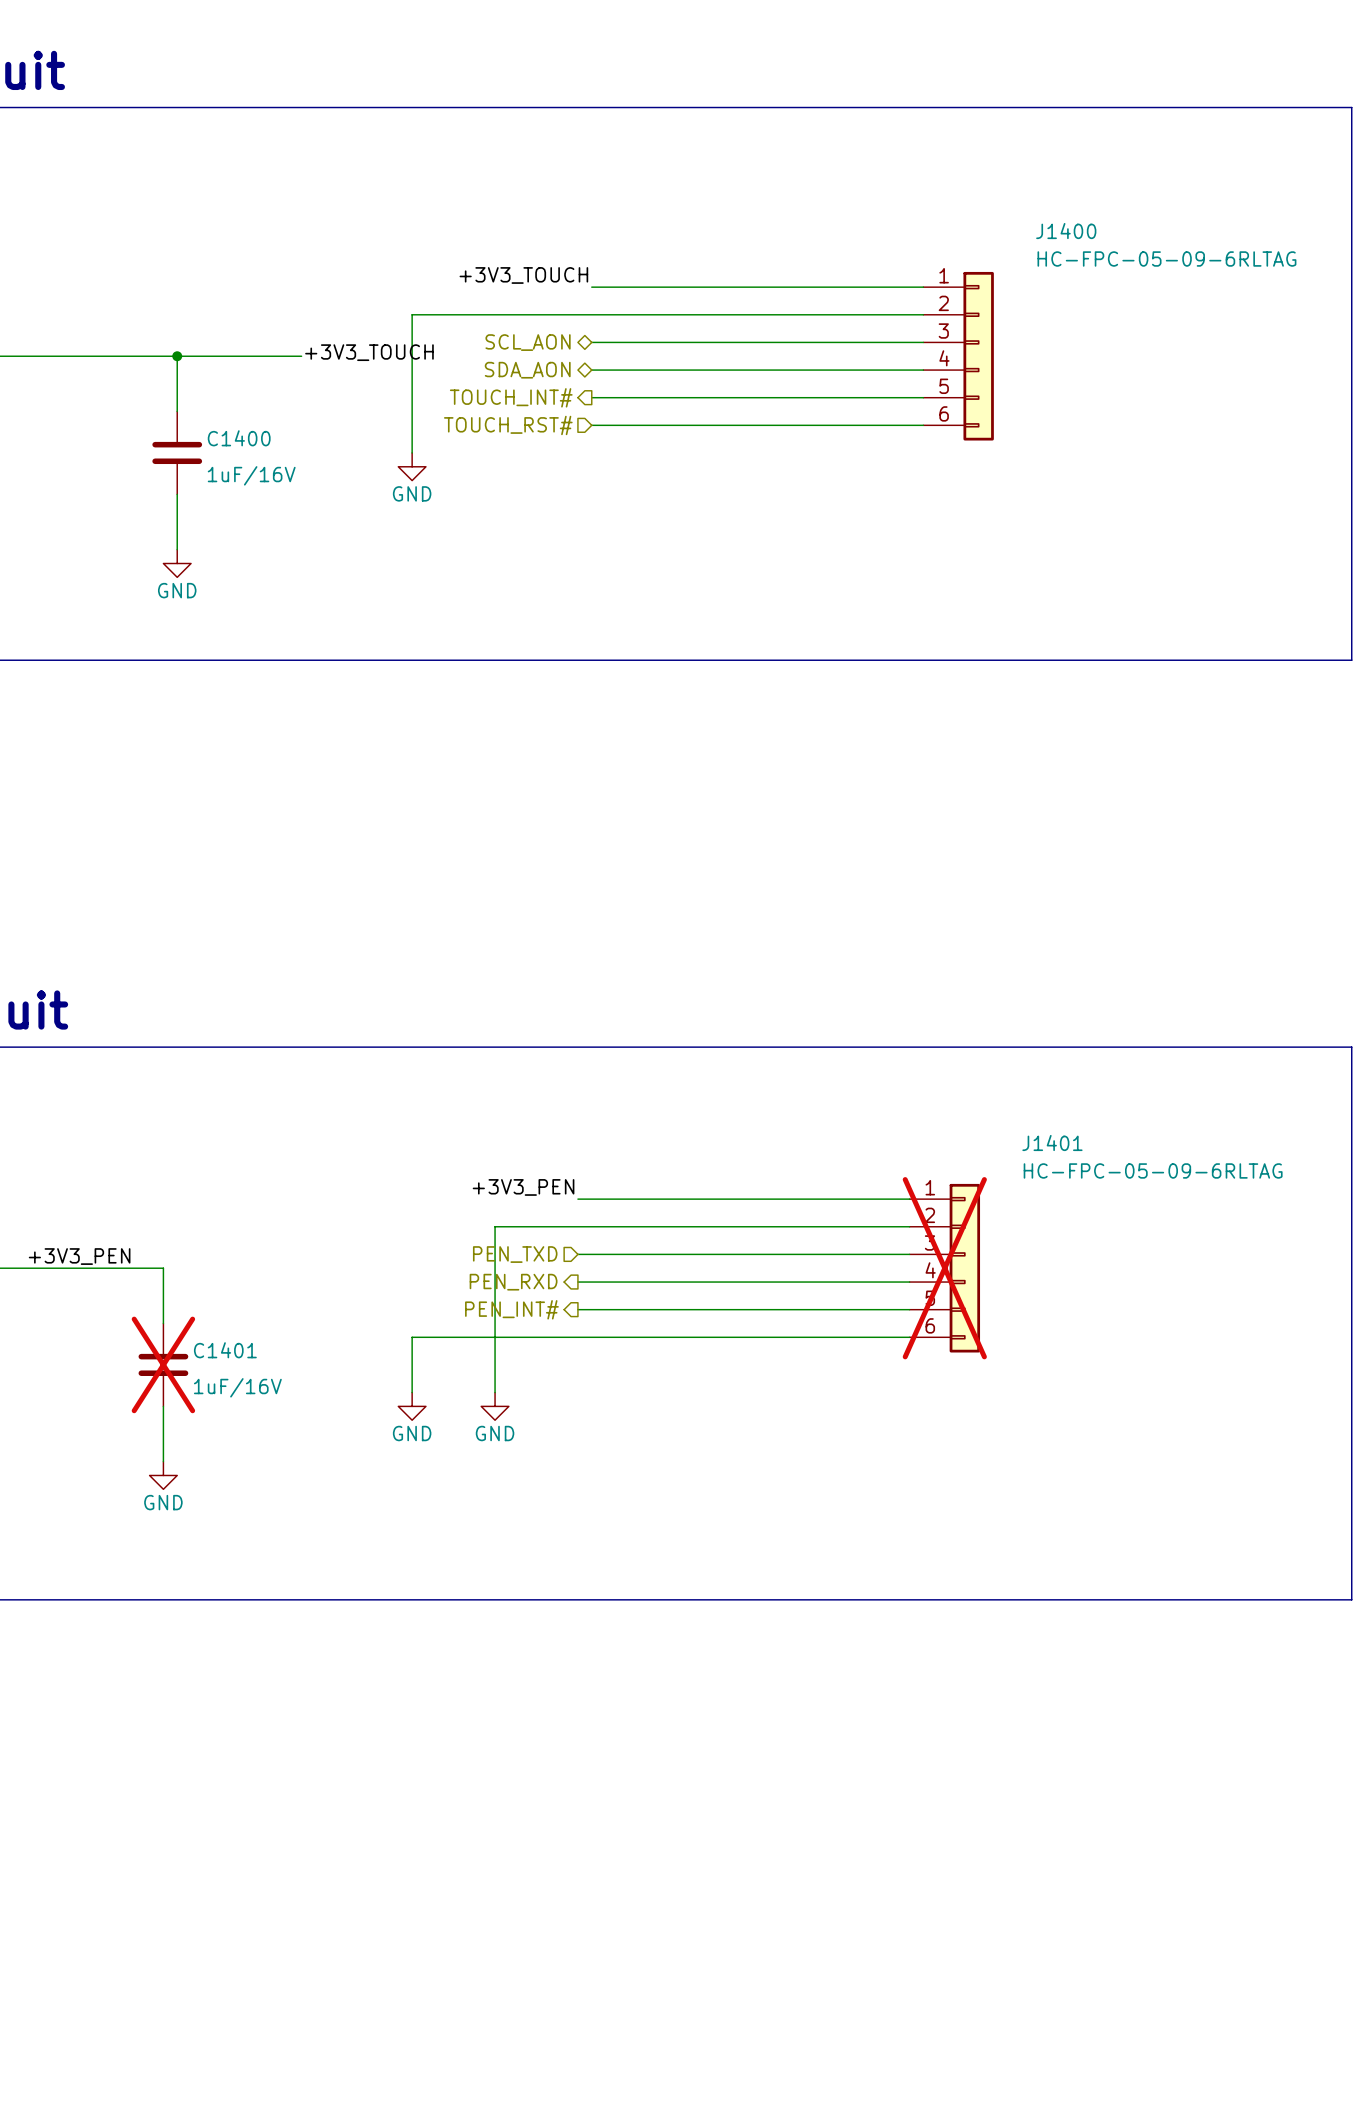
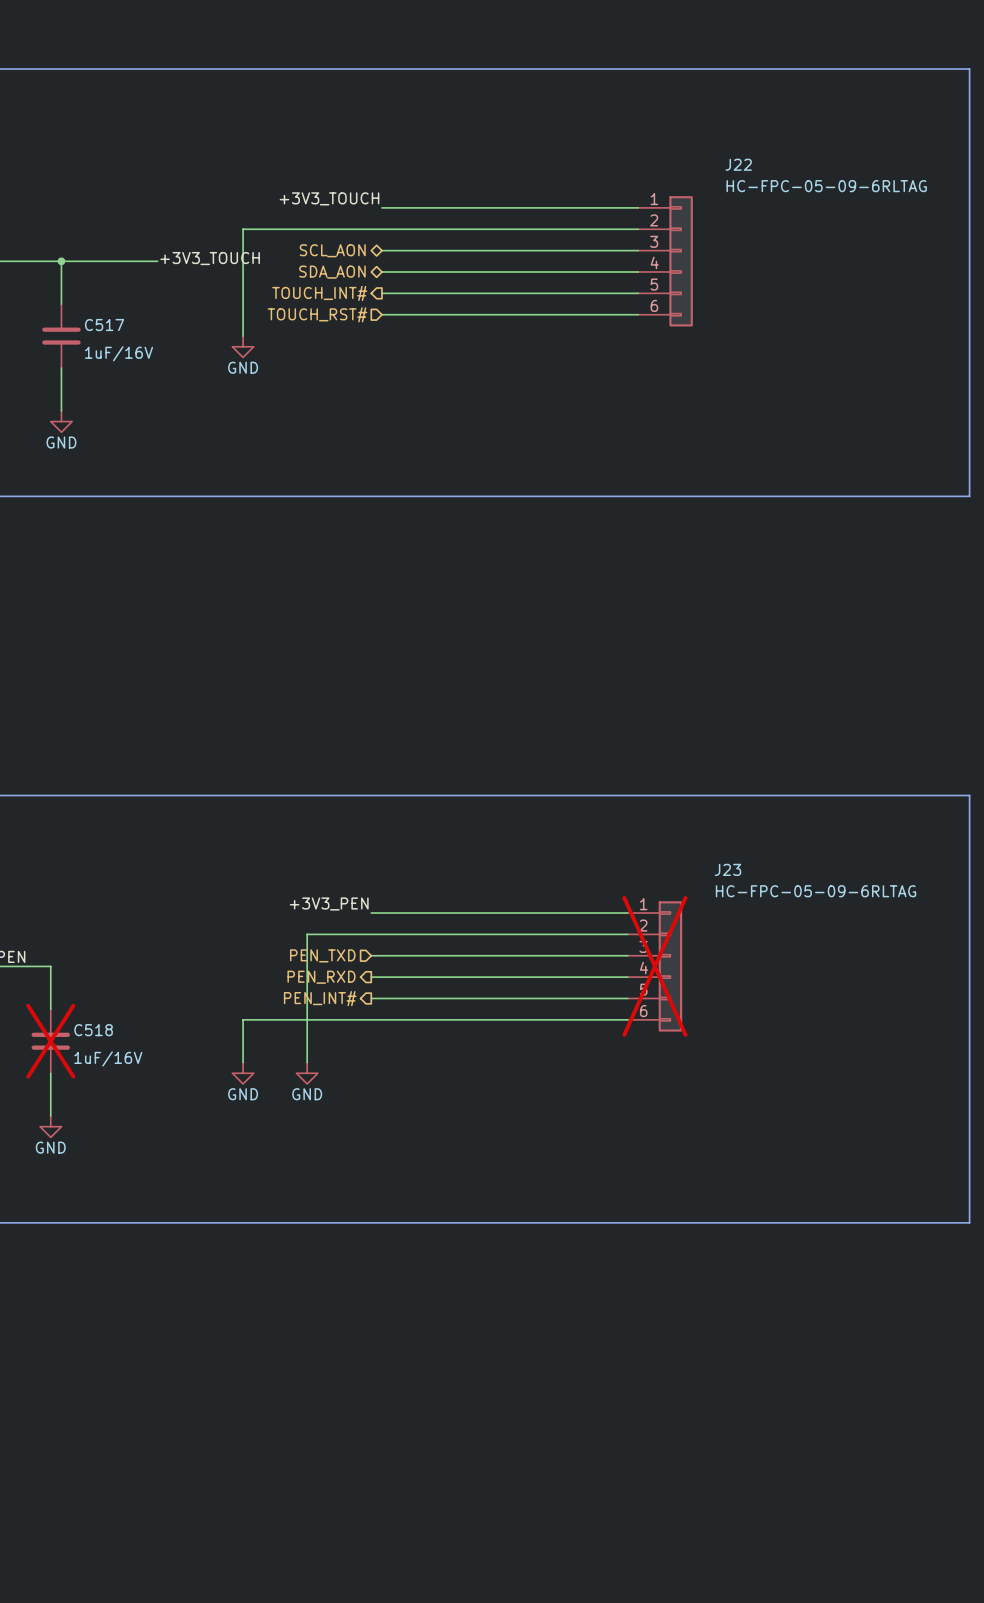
J1400 name: J1400 (1066, 231) -> J22 (738, 164)
C1400 name: C1400 (239, 438) -> C517 (104, 325)
J1401 name: J1401 (1052, 1143) -> J23 (728, 869)
C1401 name: C1401 (225, 1350) -> C518 (93, 1030)

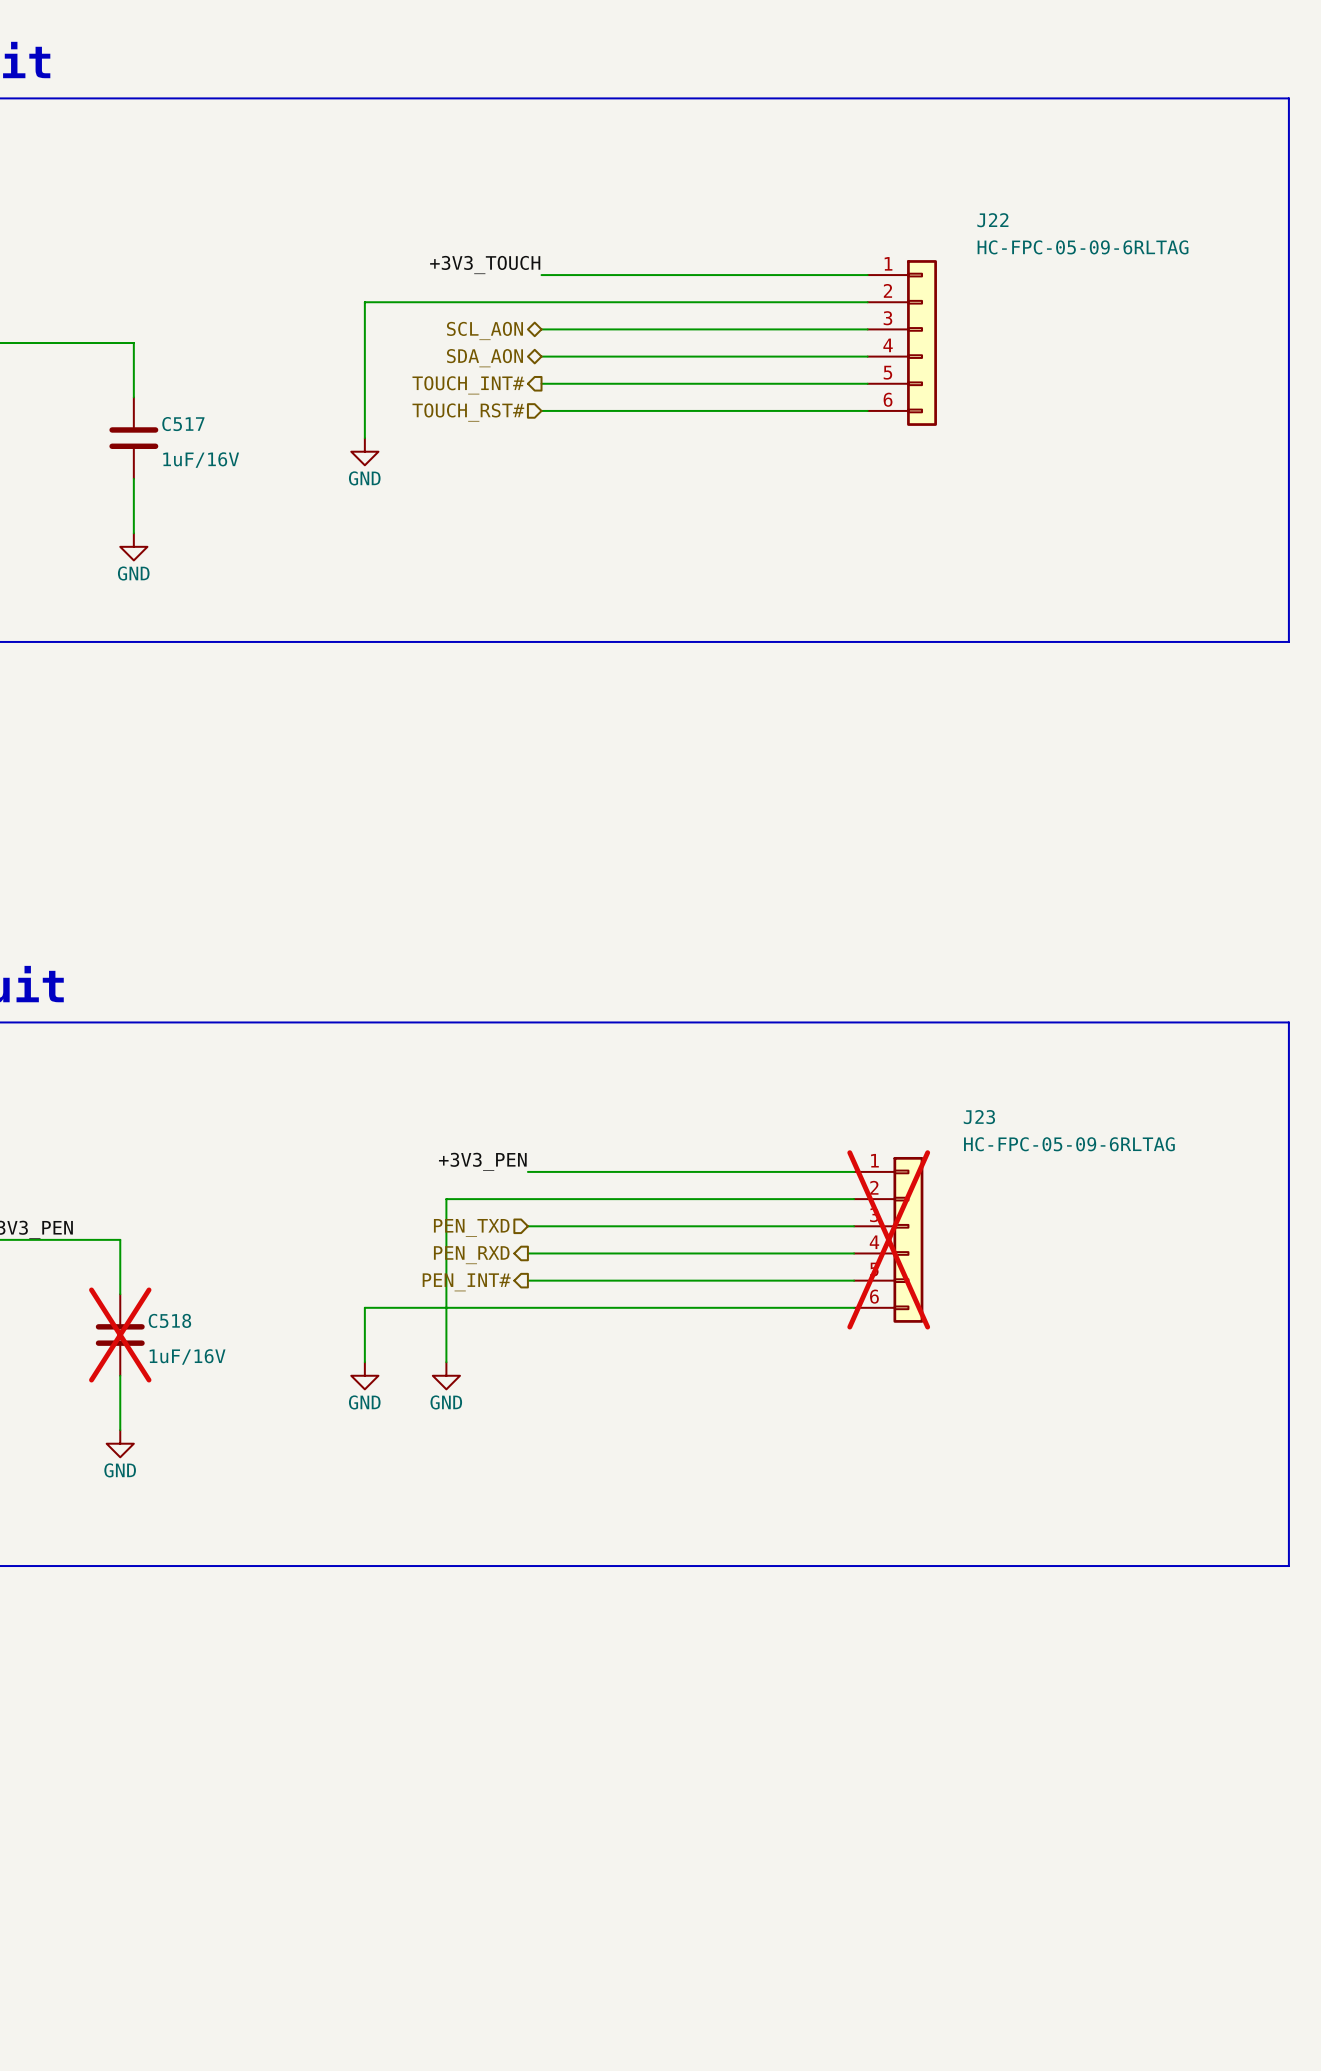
label: +3V3_TOUCH (210, 258) -> none
wire: (61, 261) (157, 261) -> none
junction: (61, 261) -> none

